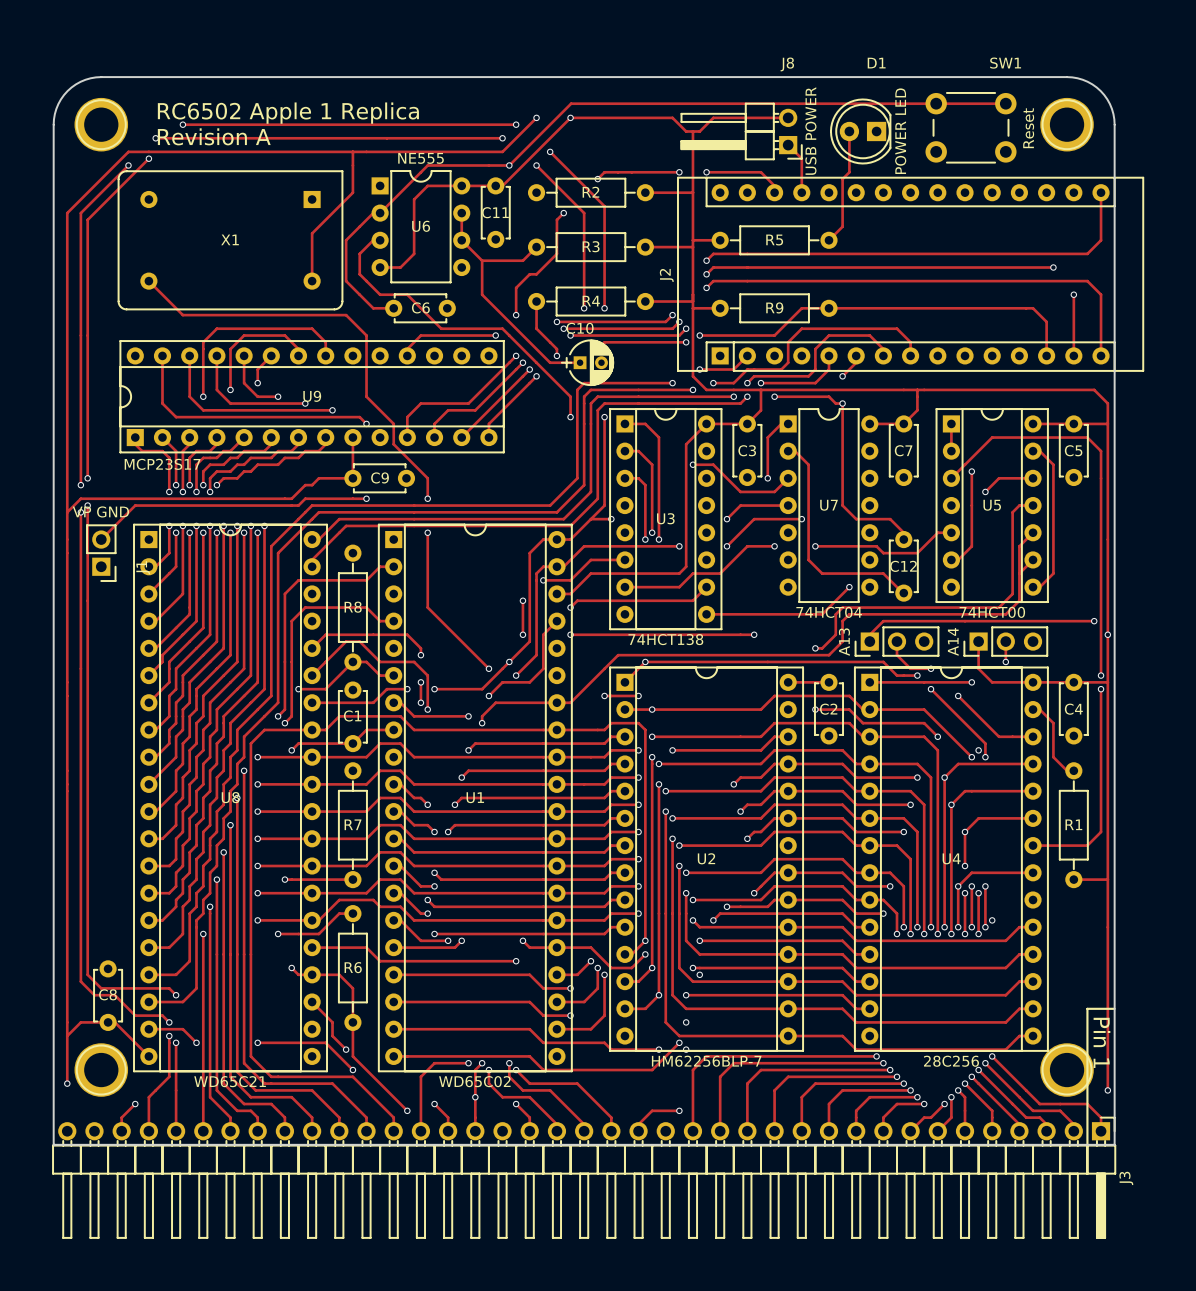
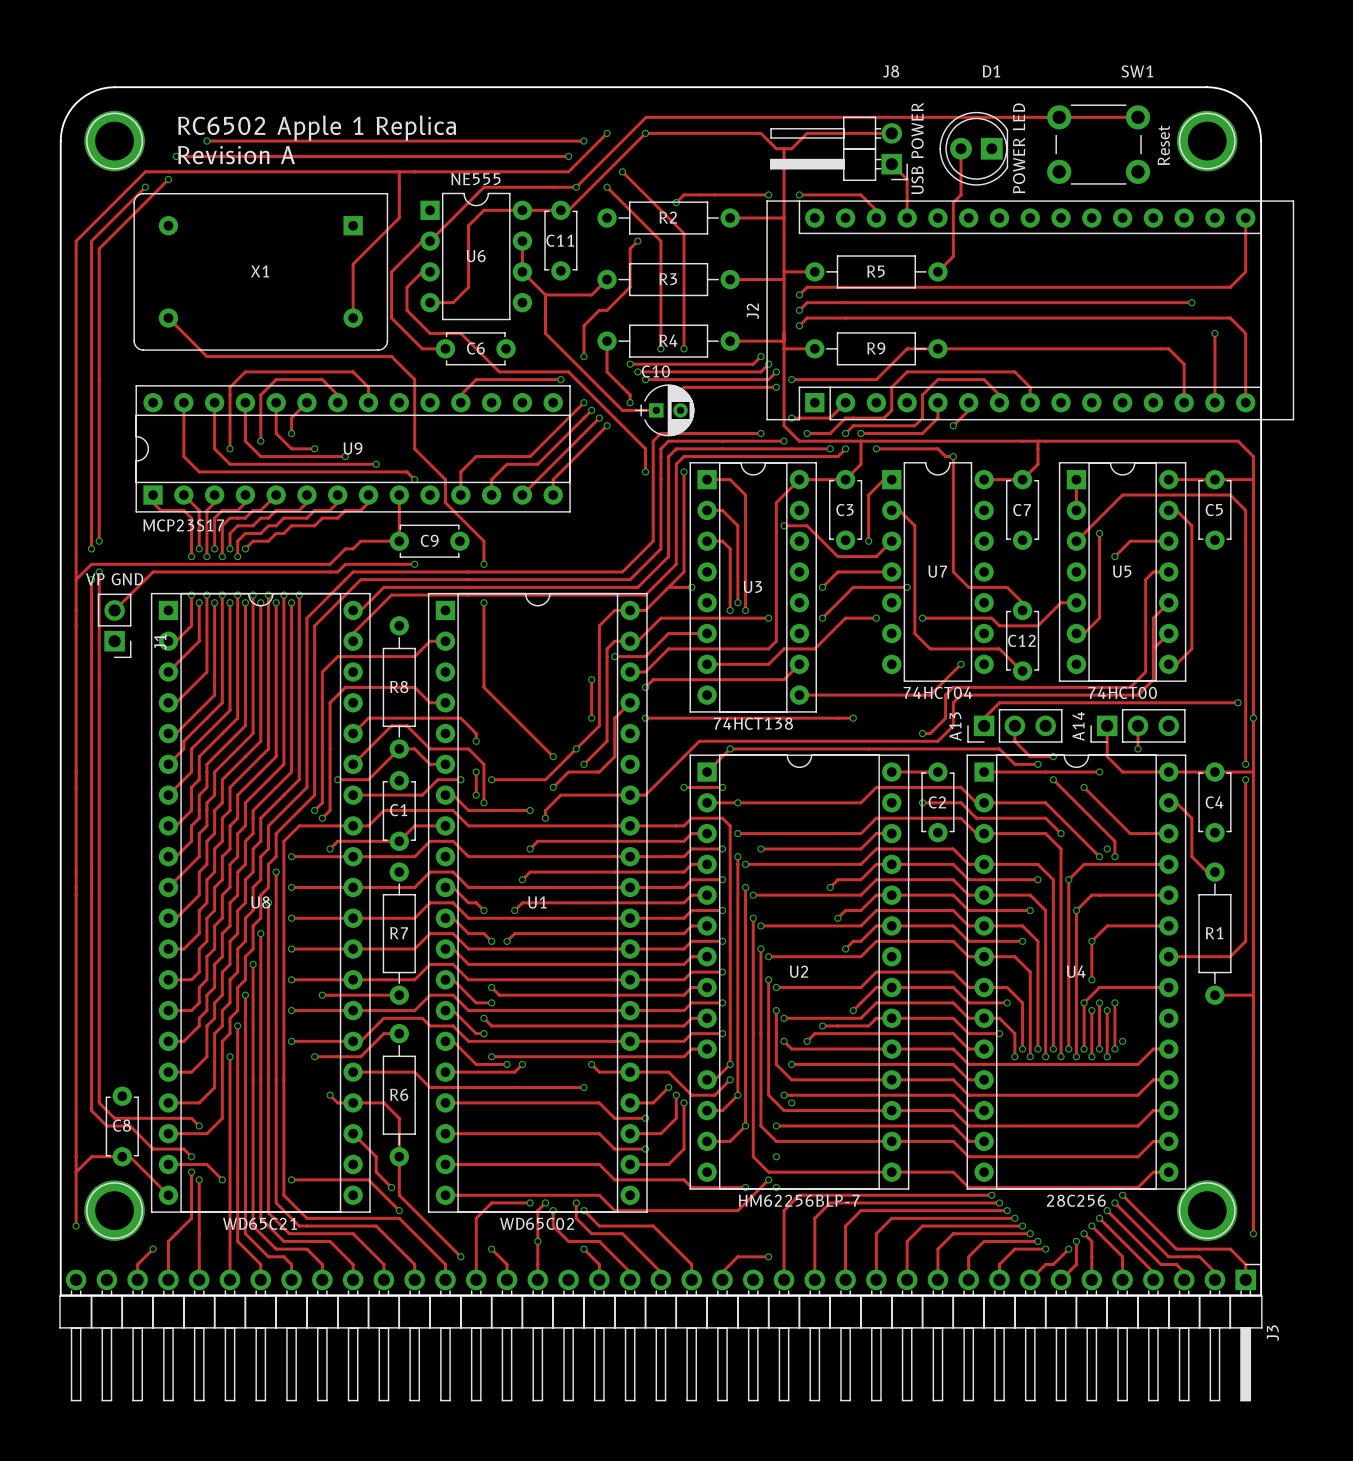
line: (1114, 1008) (1087, 1008) (1087, 1144) -> none
text: Pin 1 (1101, 1042) -> none

